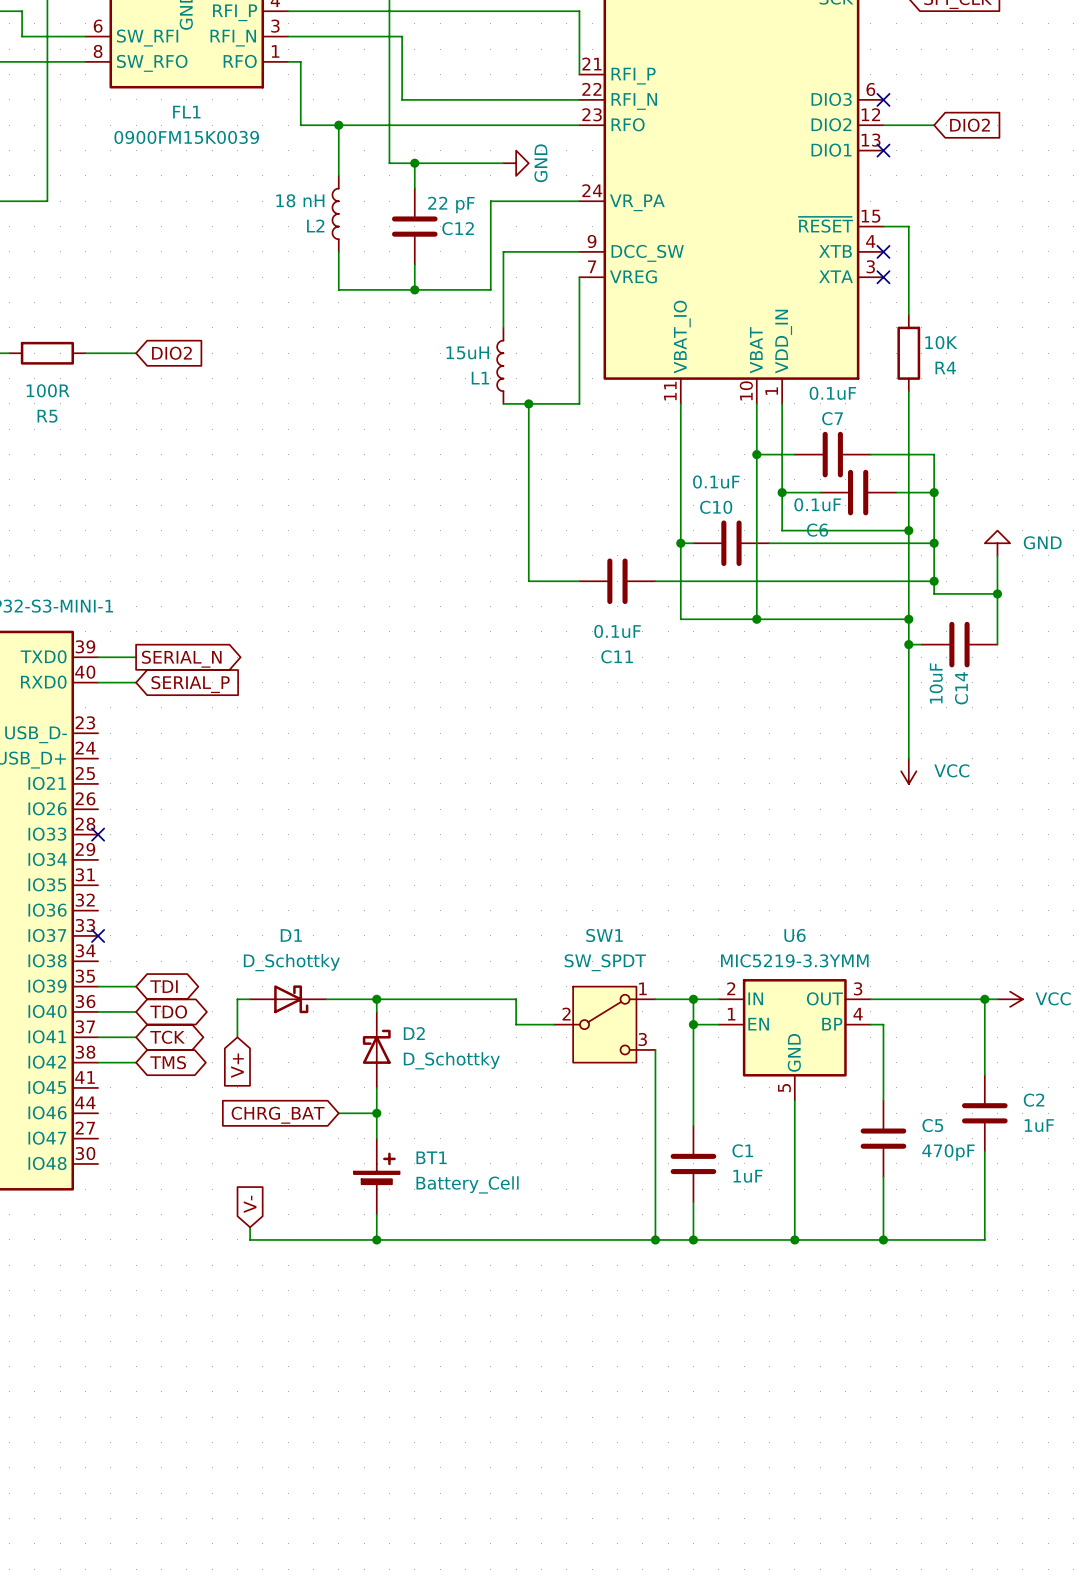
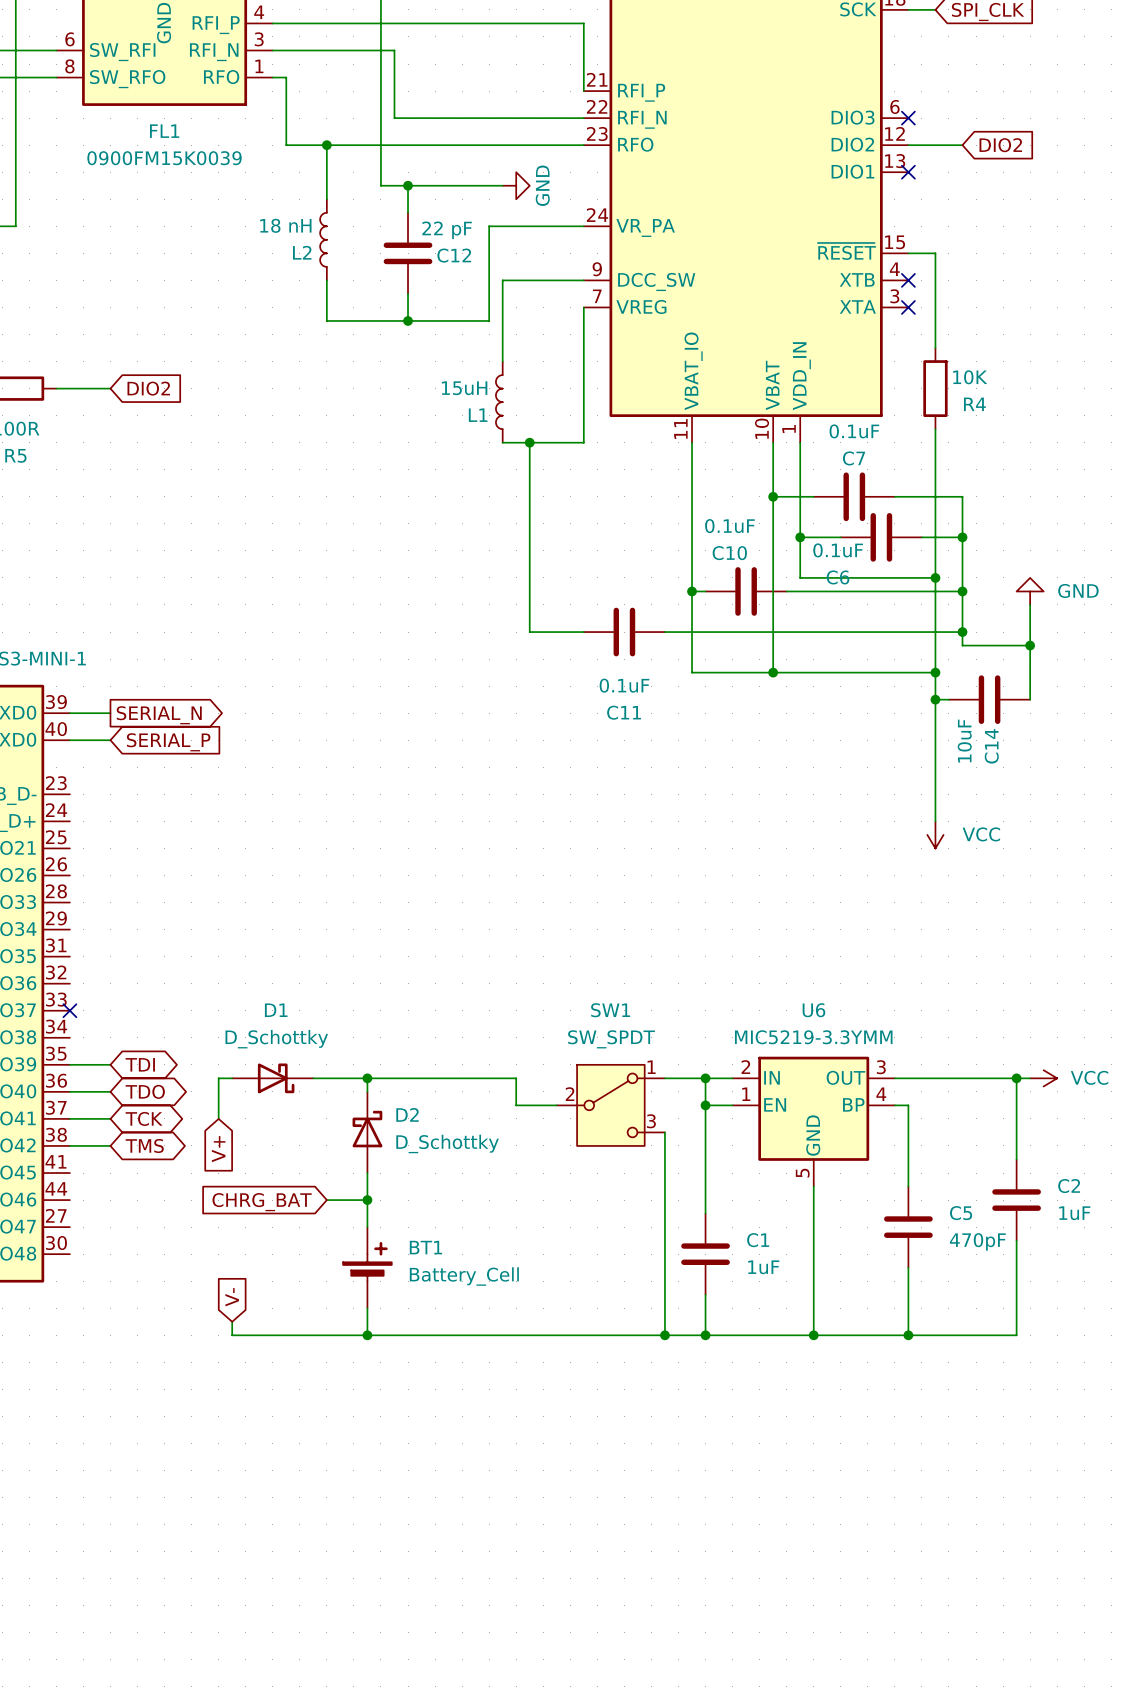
no-connect mark: (98, 834) -> none

